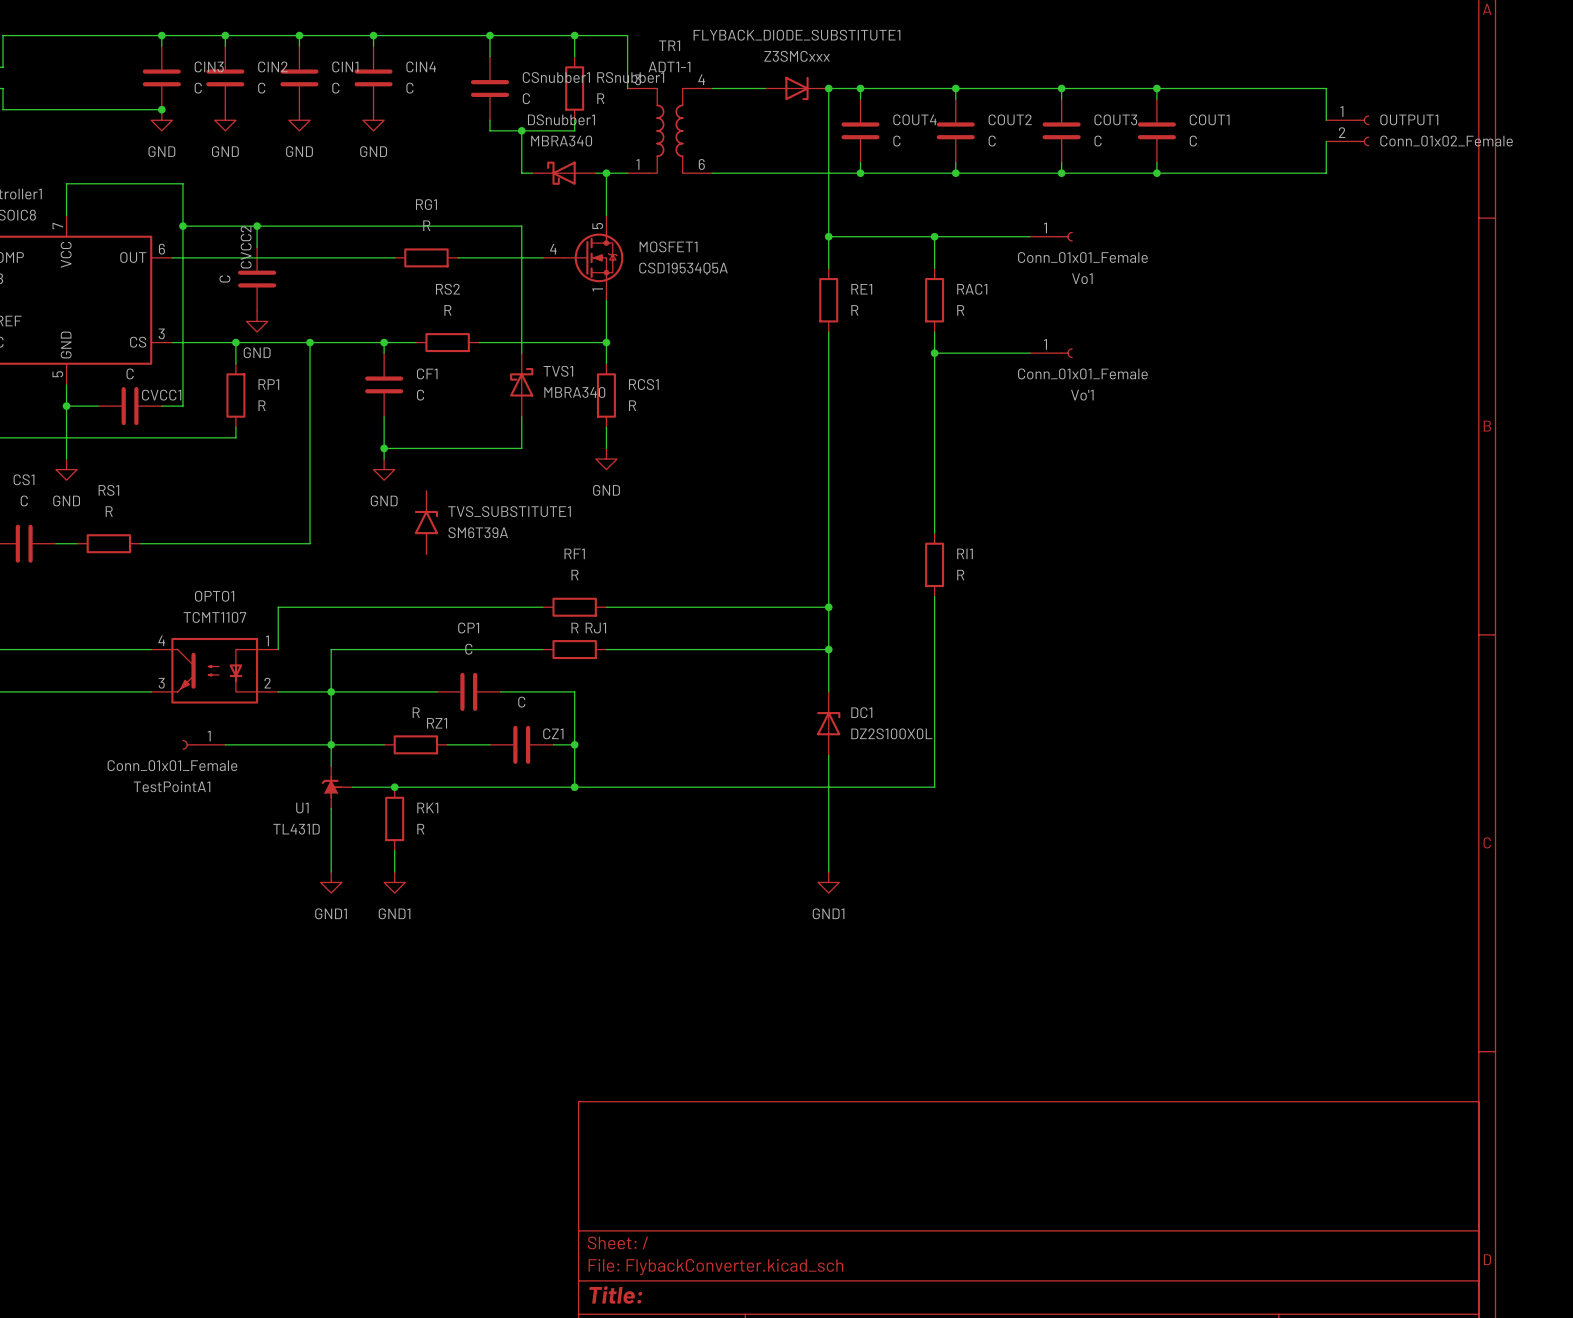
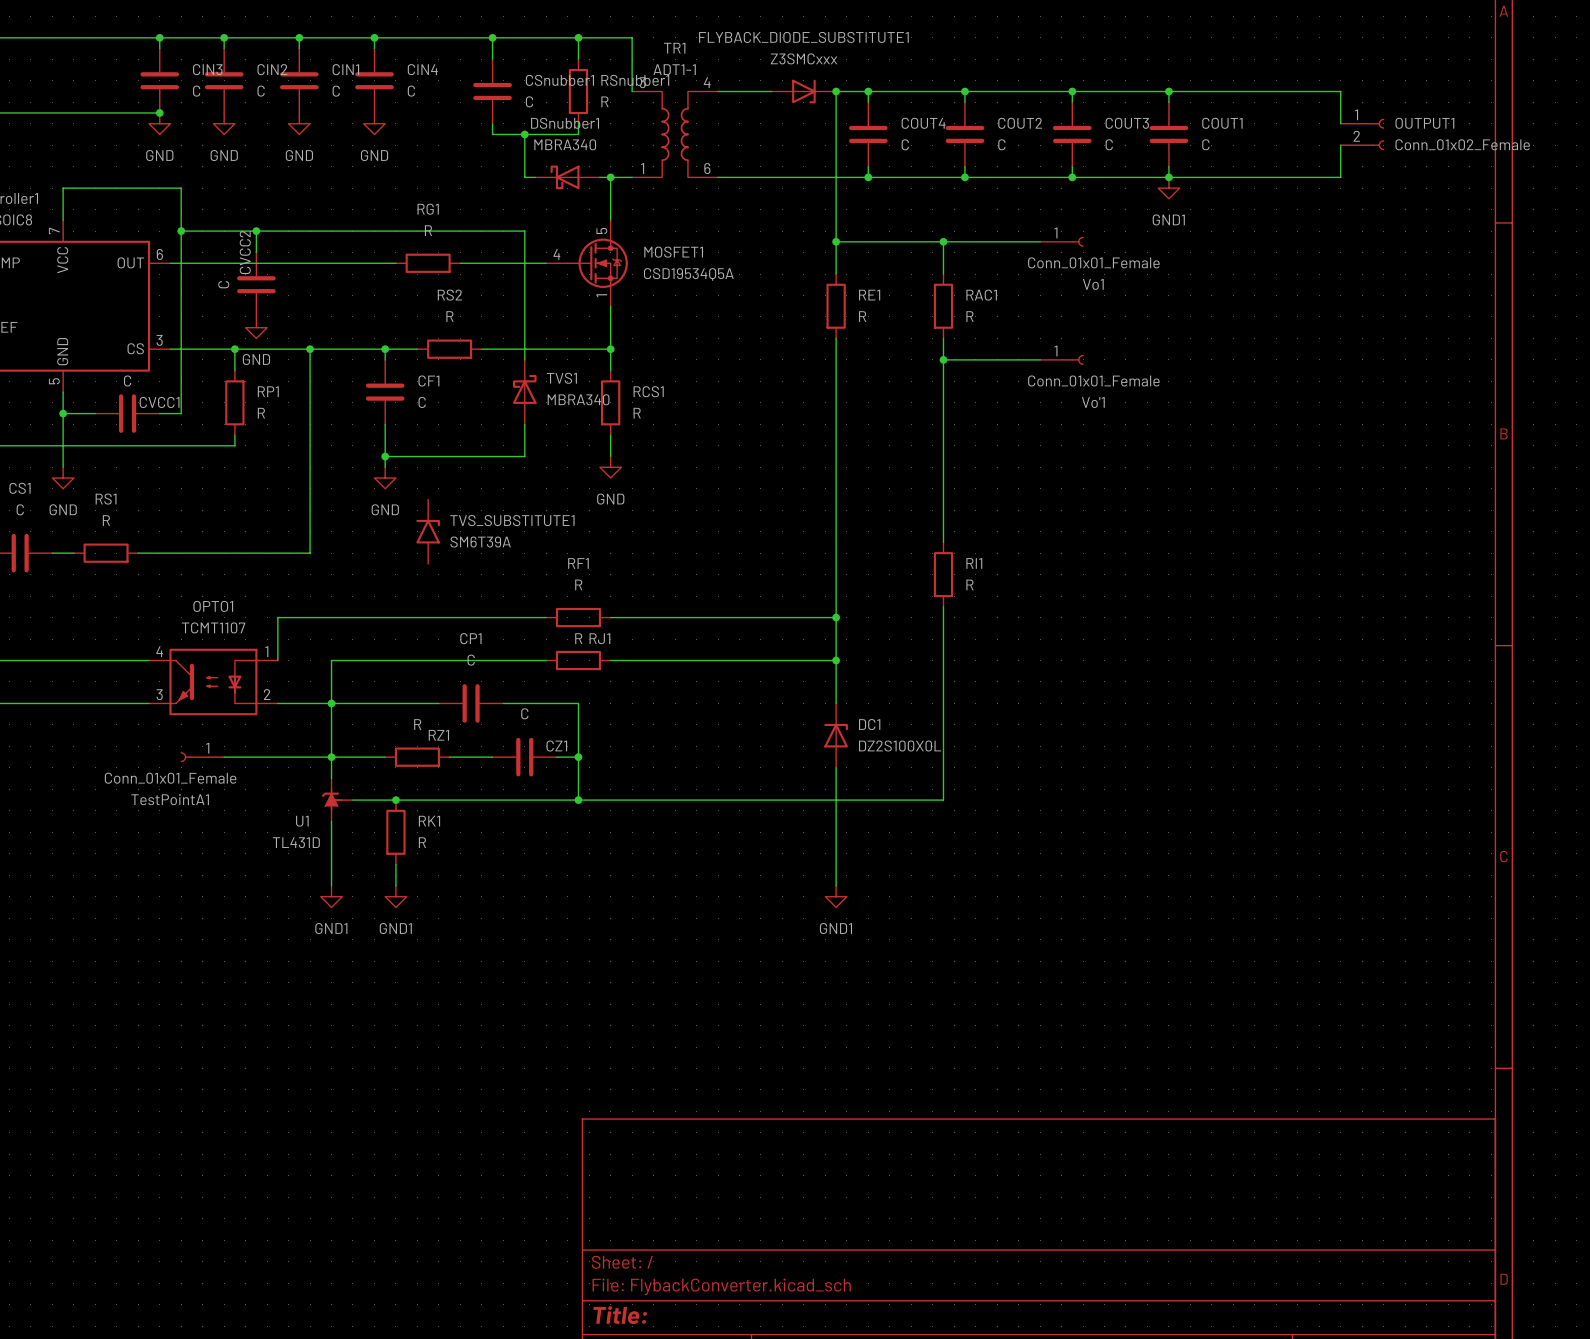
power symbol: none -> GND1 (1168, 188)

